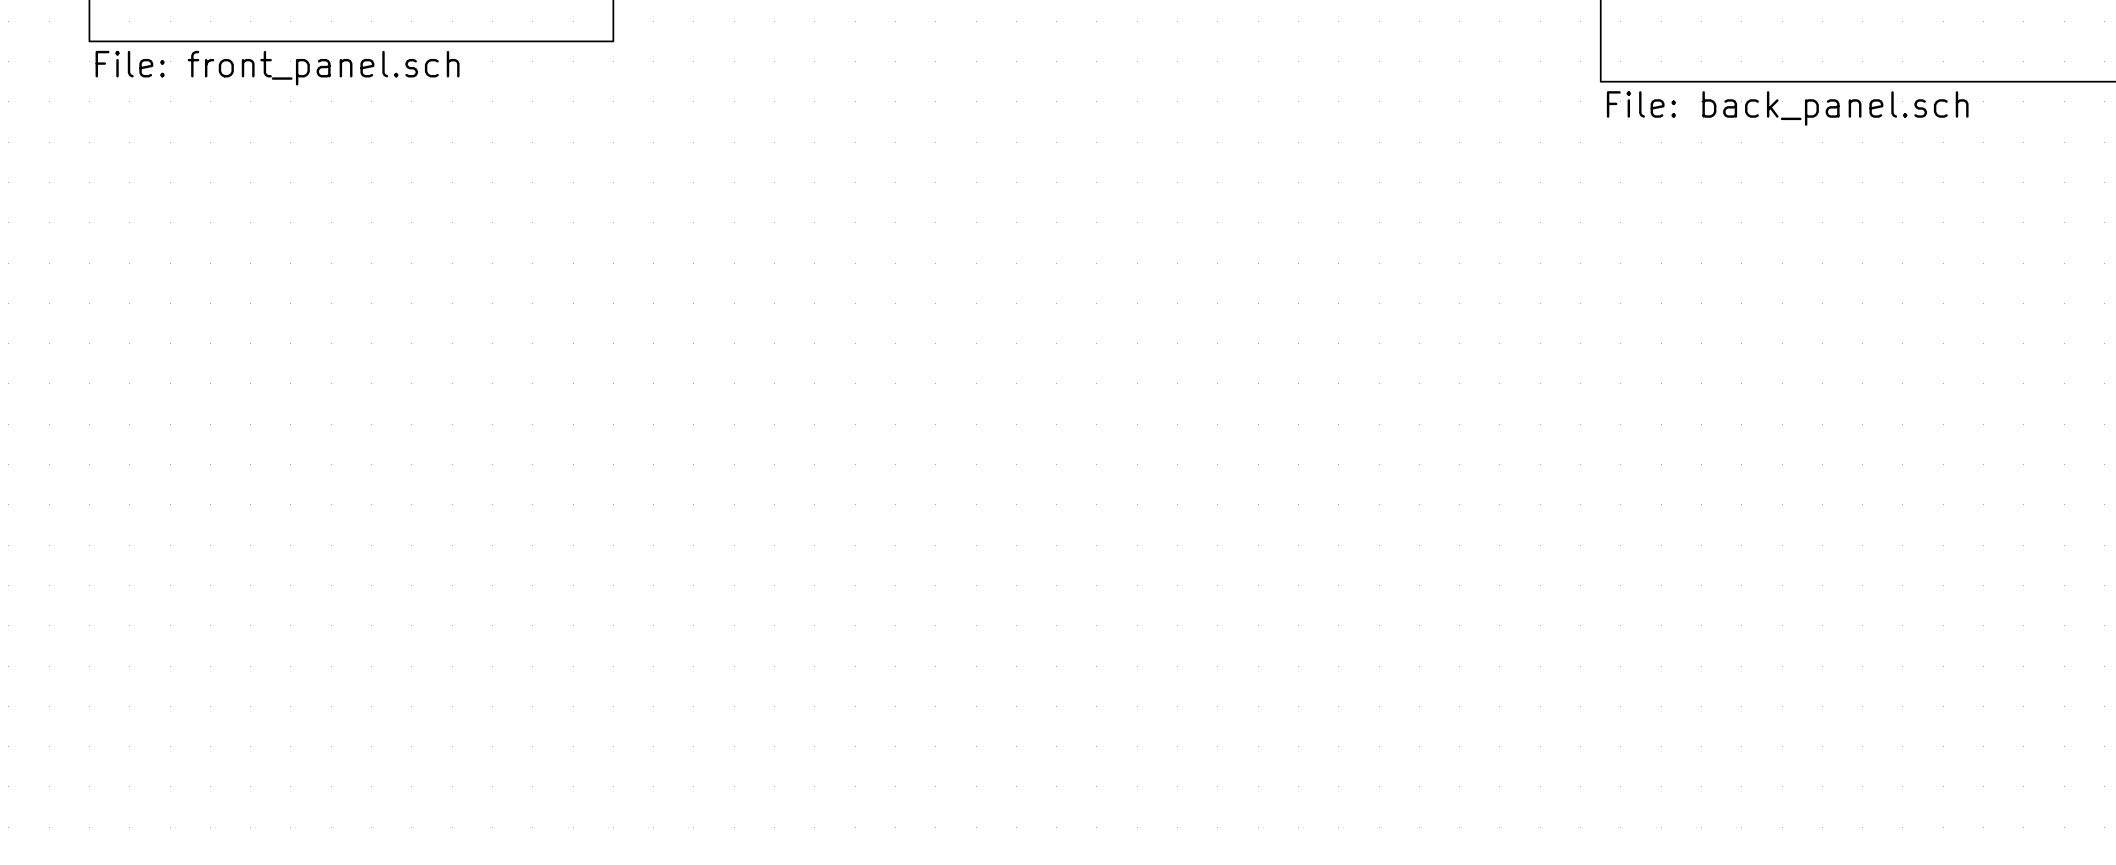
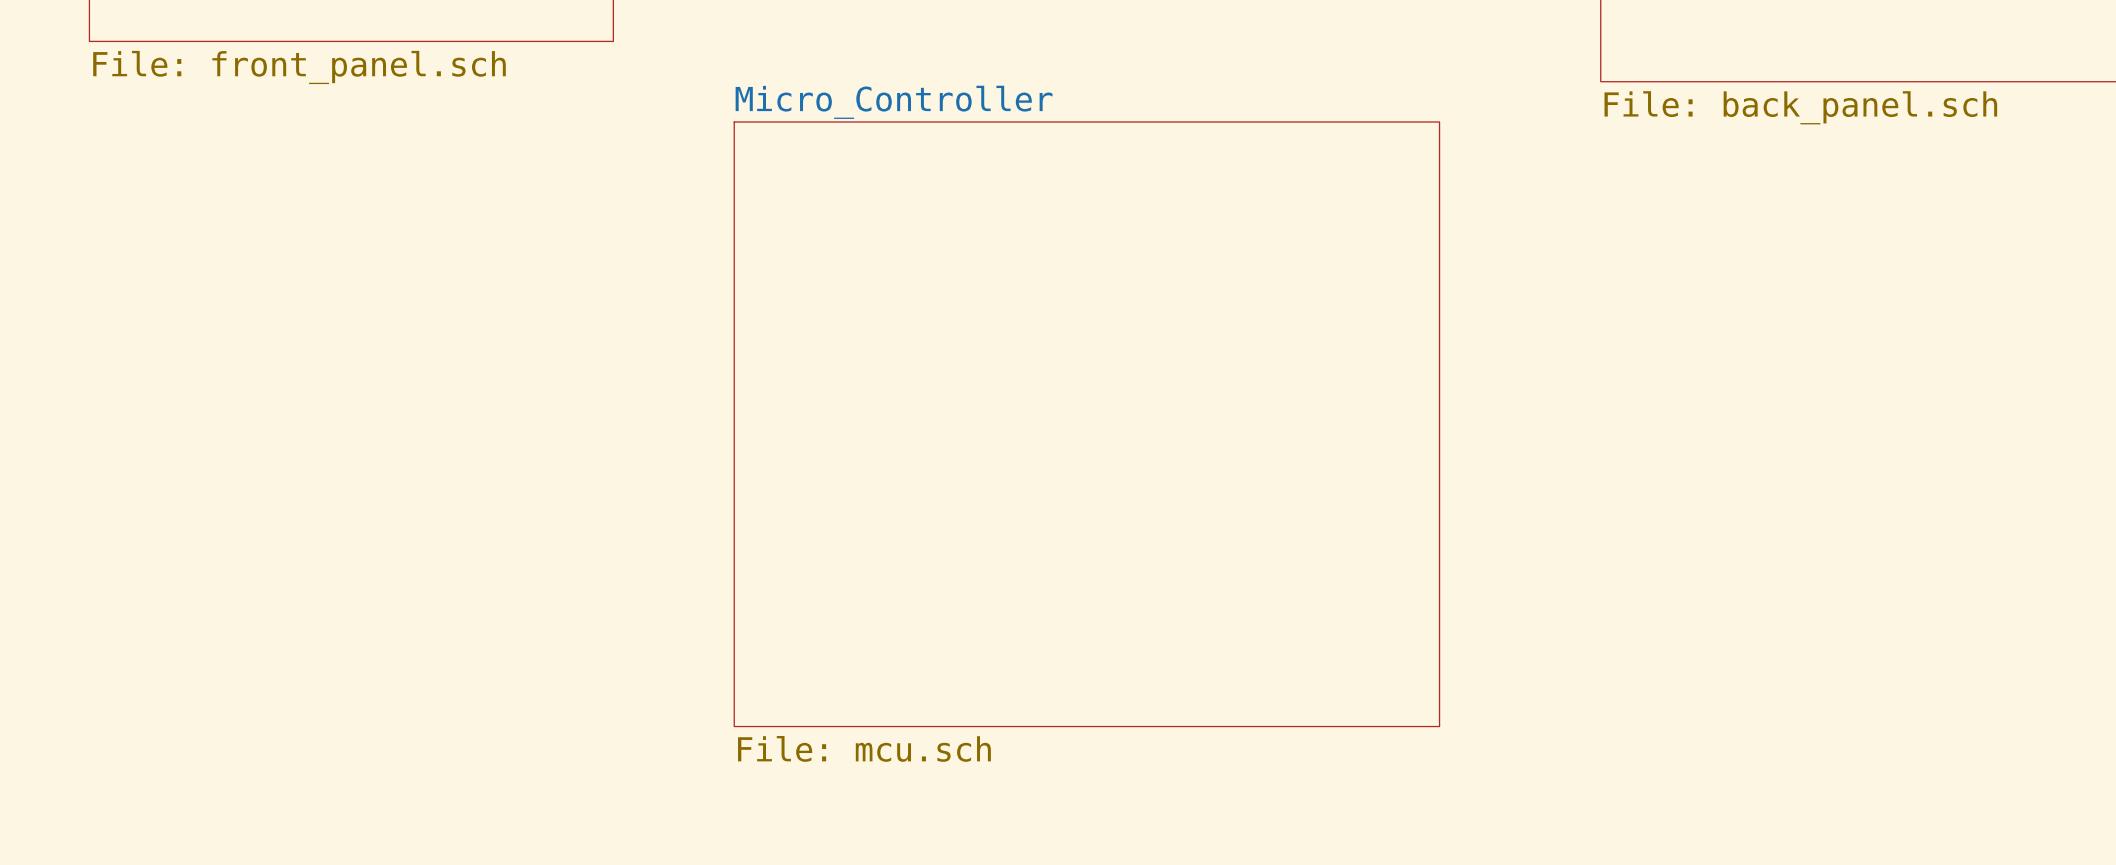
sheet Micro_Controller: none -> File: mcu.sch (1086, 424)

